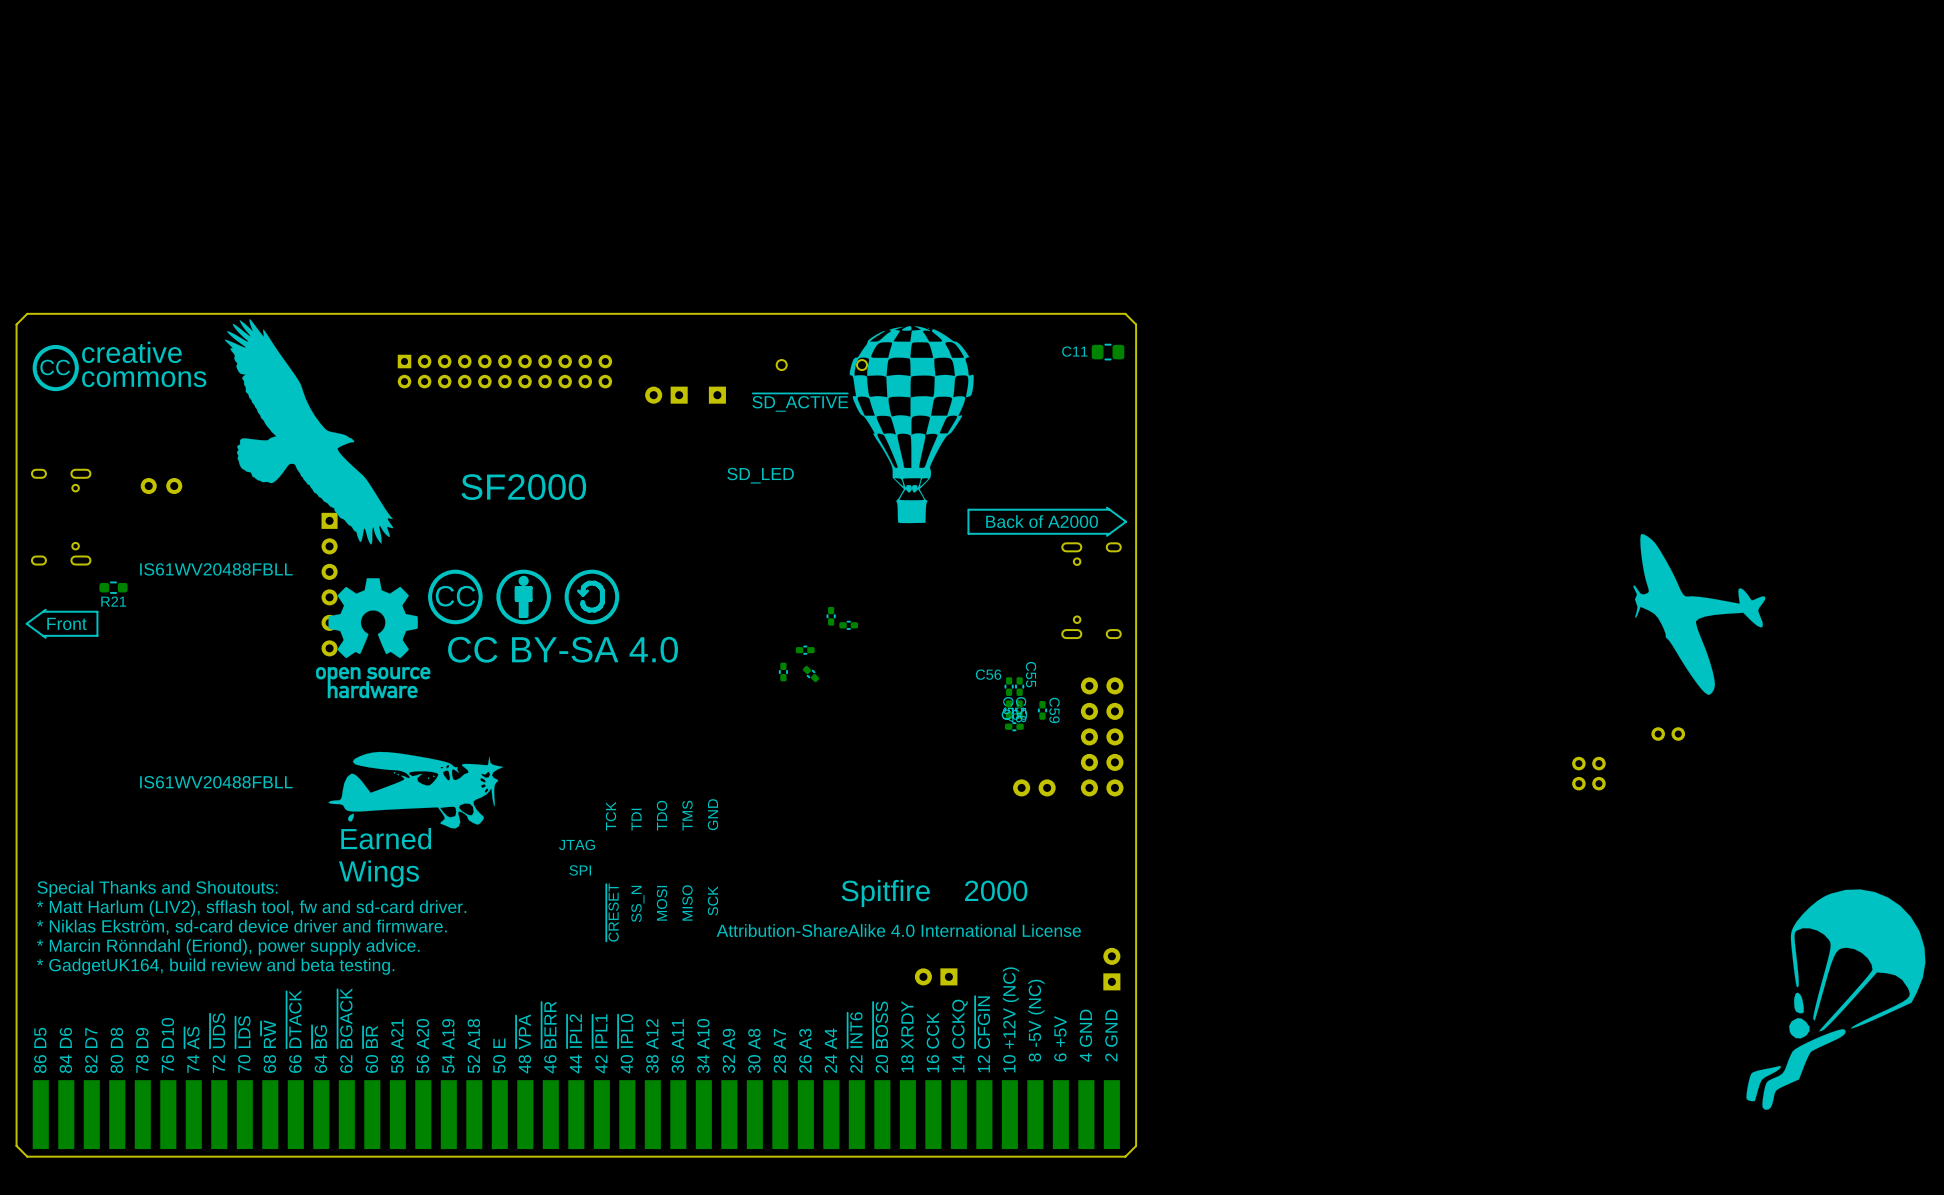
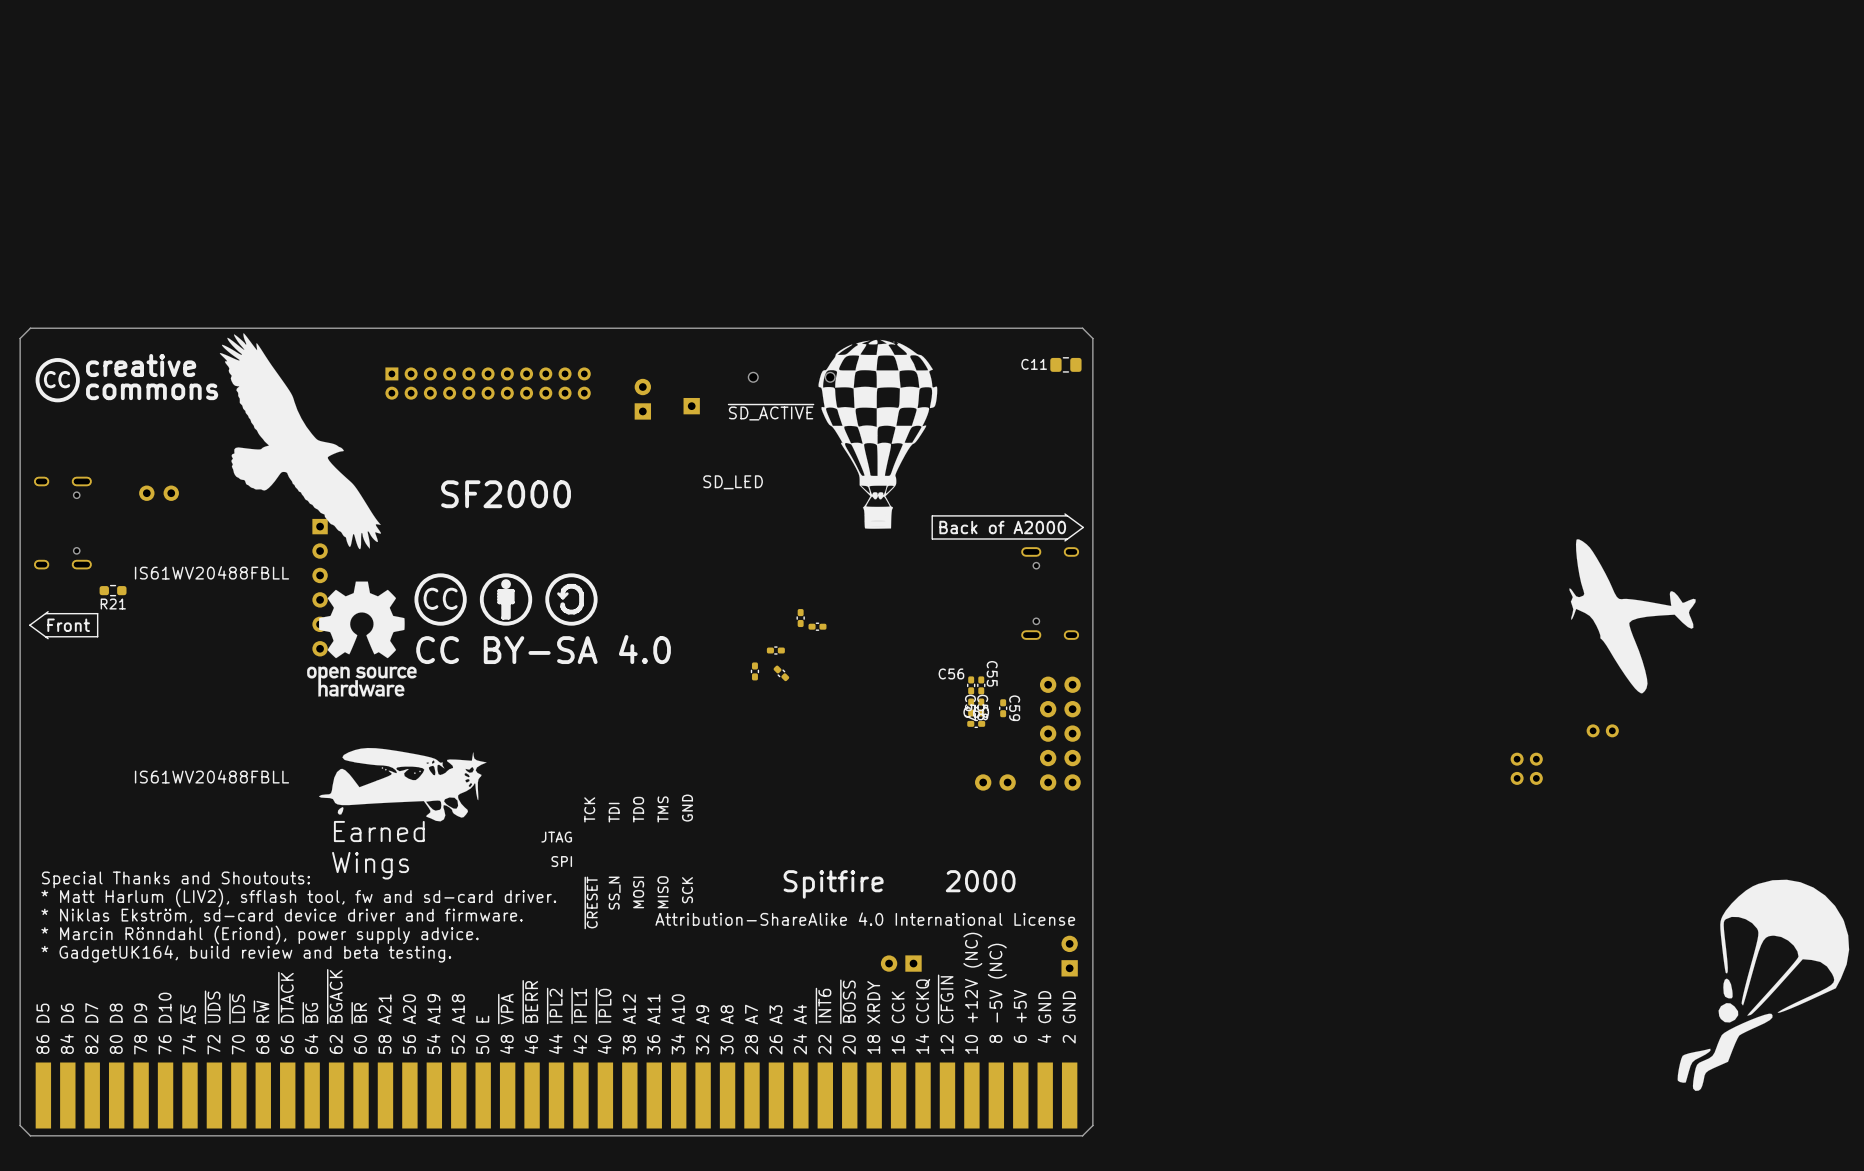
part rotation: 0° (666, 395) -> 90° clockwise (642, 399)

